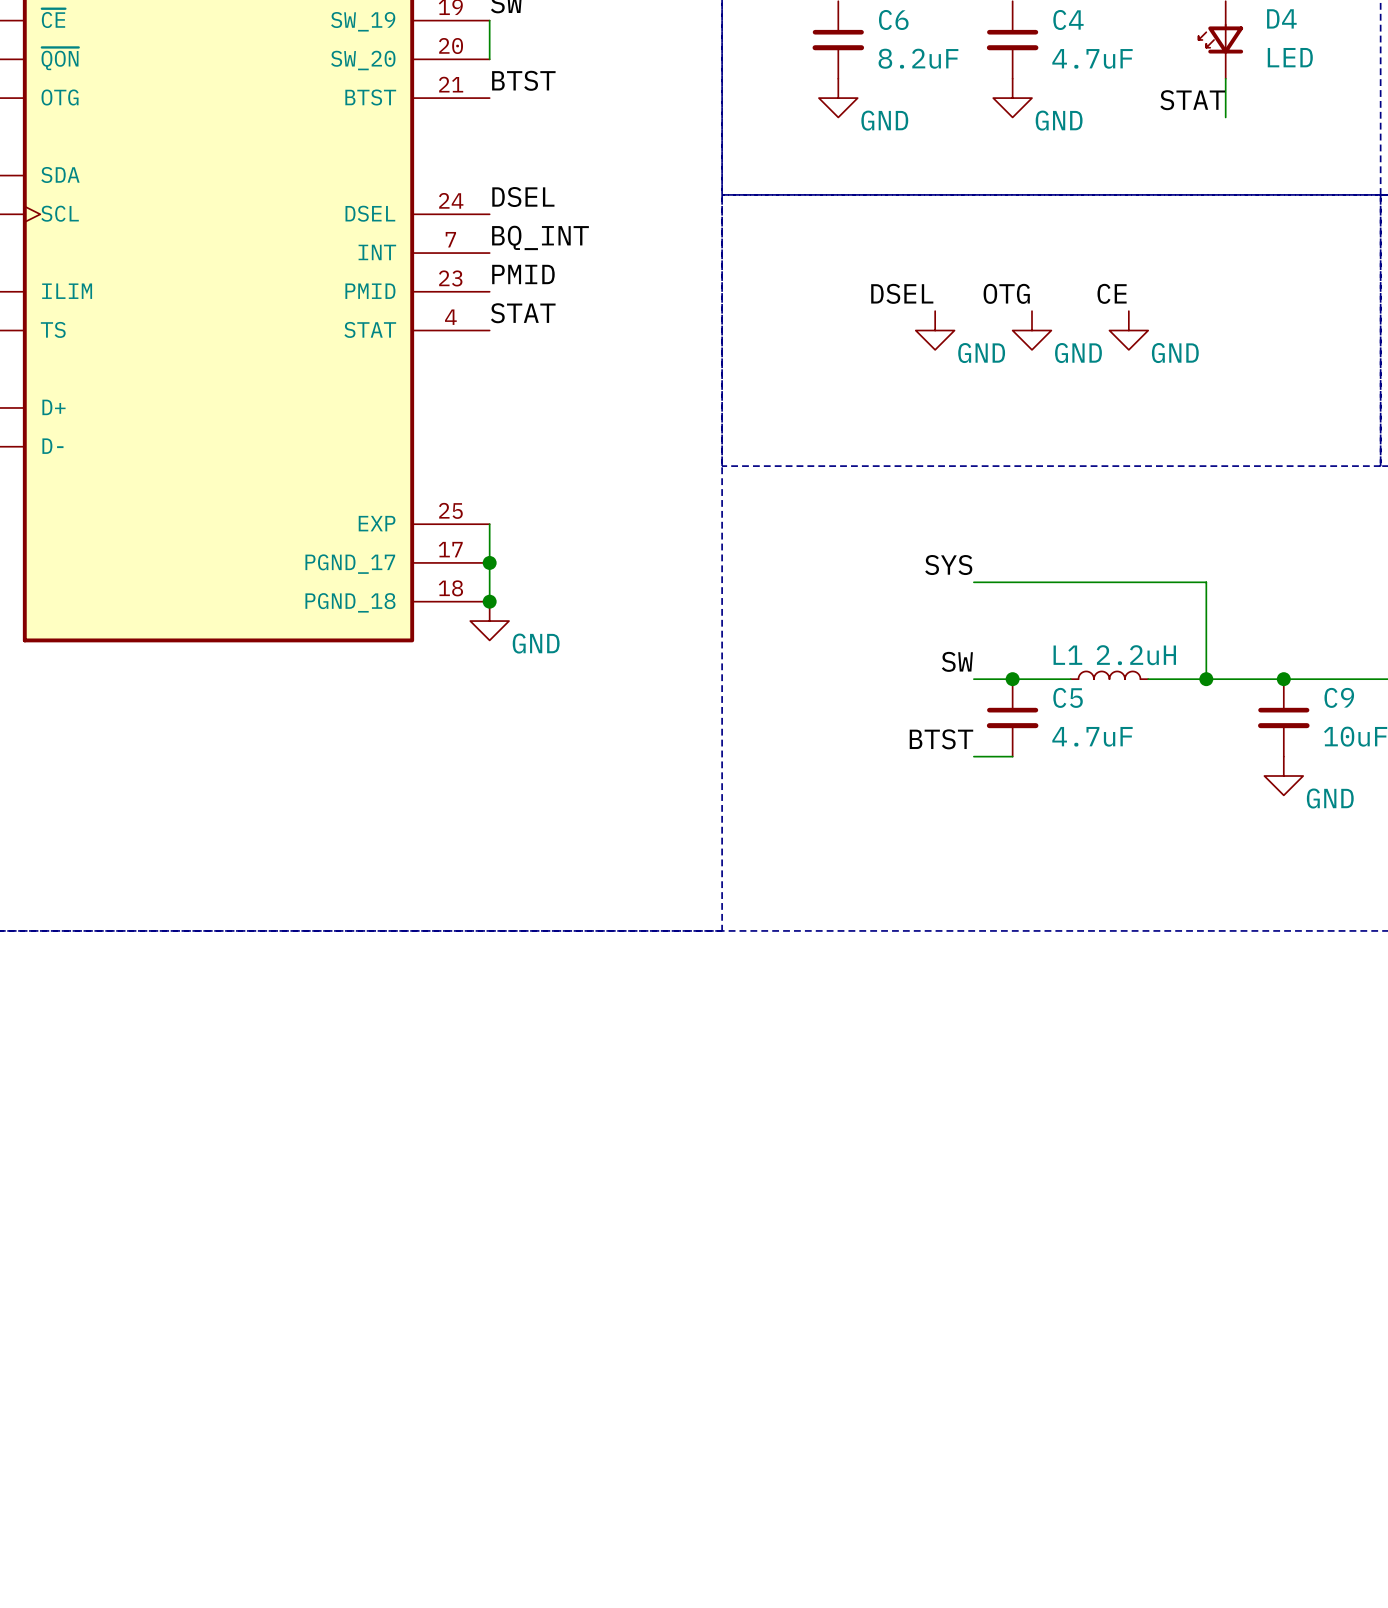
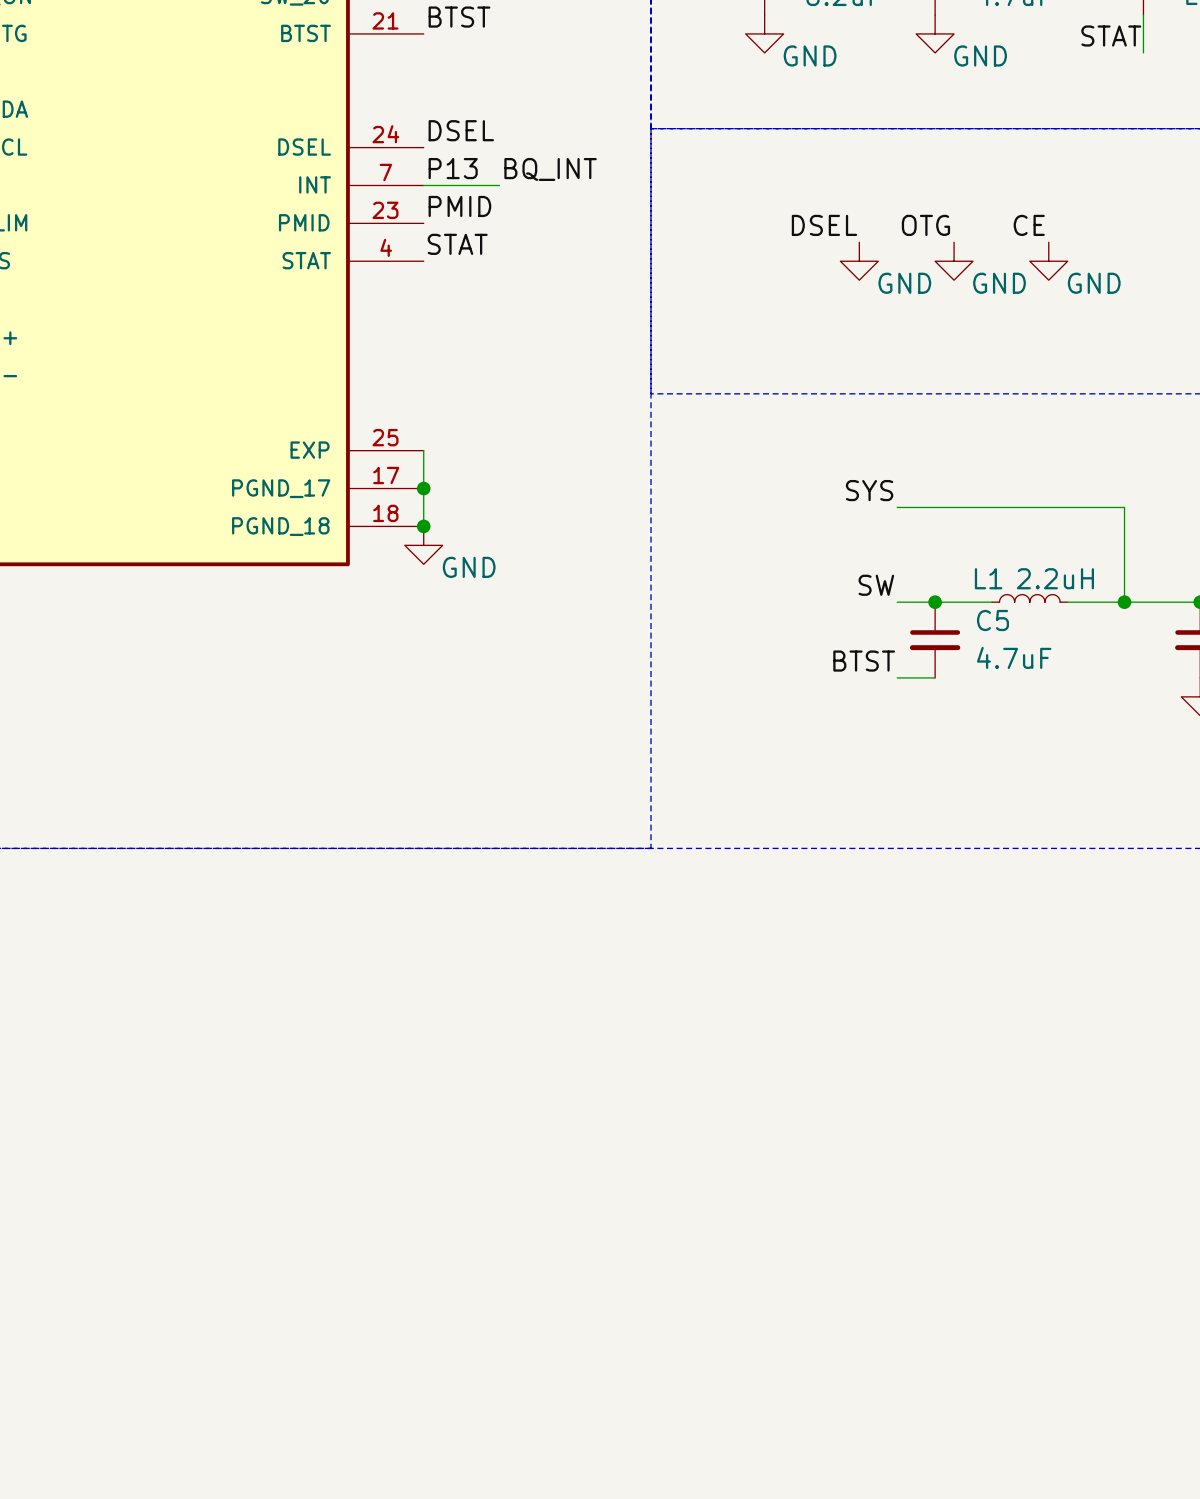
label: BQ_INT (540, 237) -> P13 (453, 168)
label: none -> BQ_INT (550, 169)
wire: none -> (423, 185) (499, 185)

